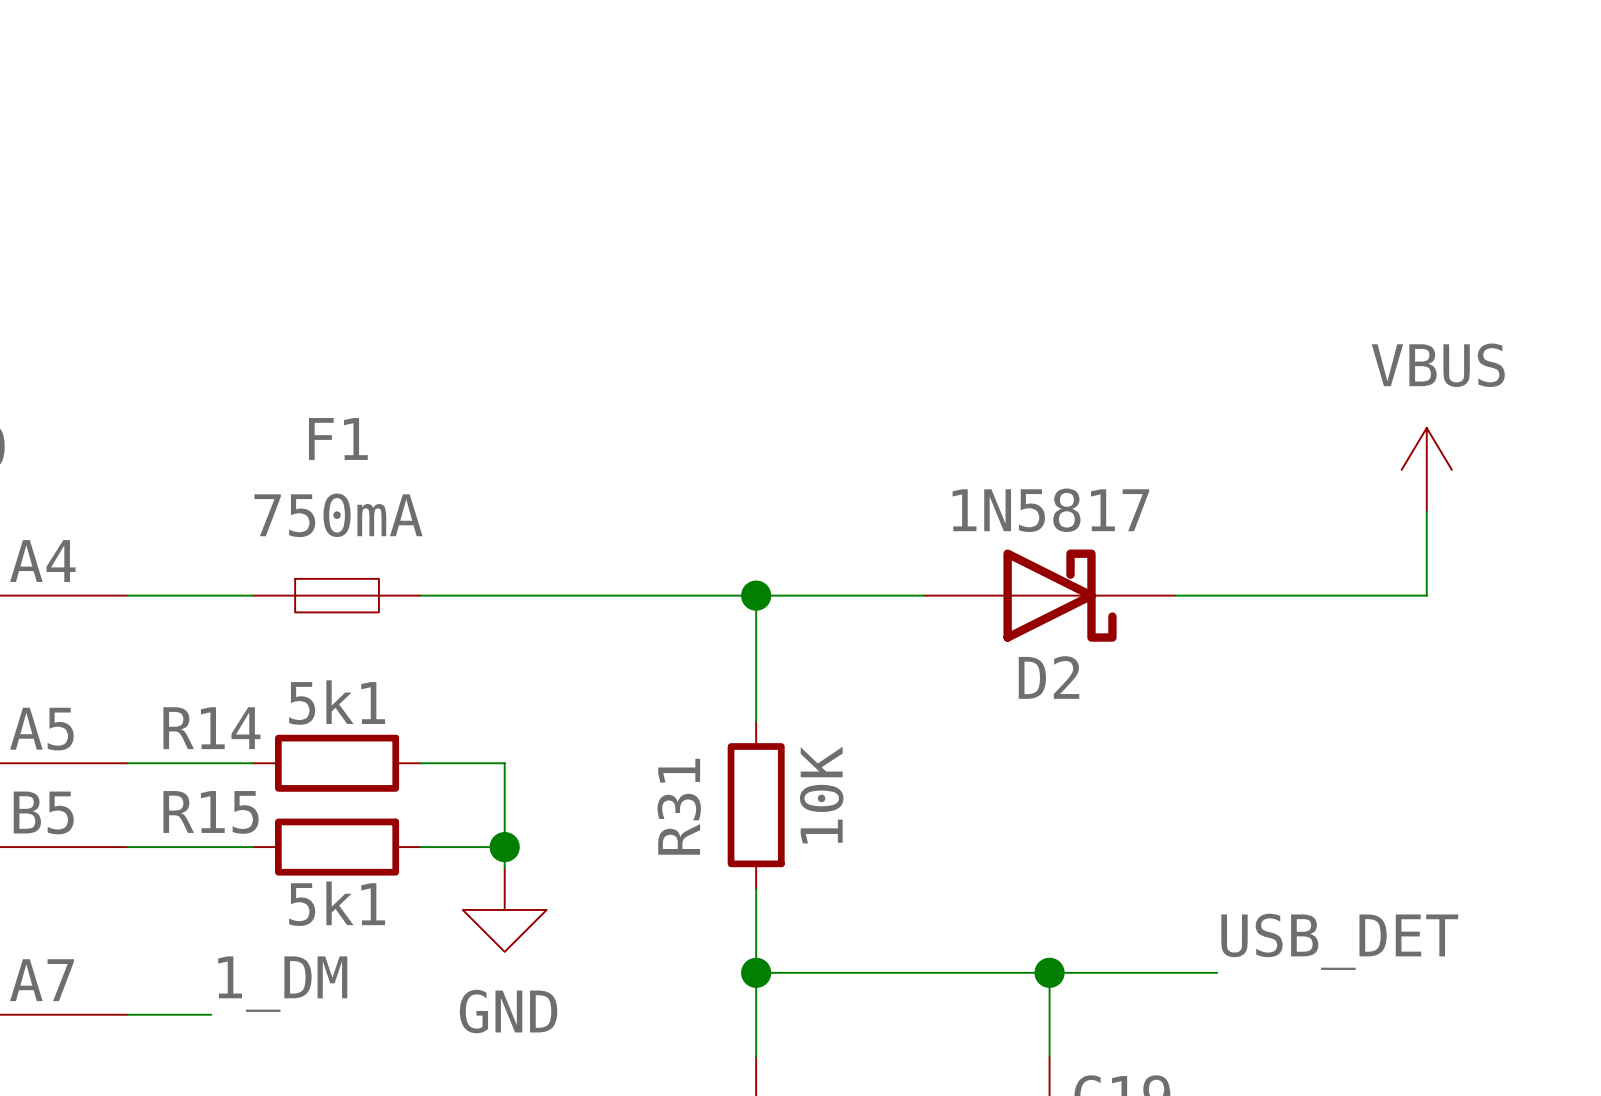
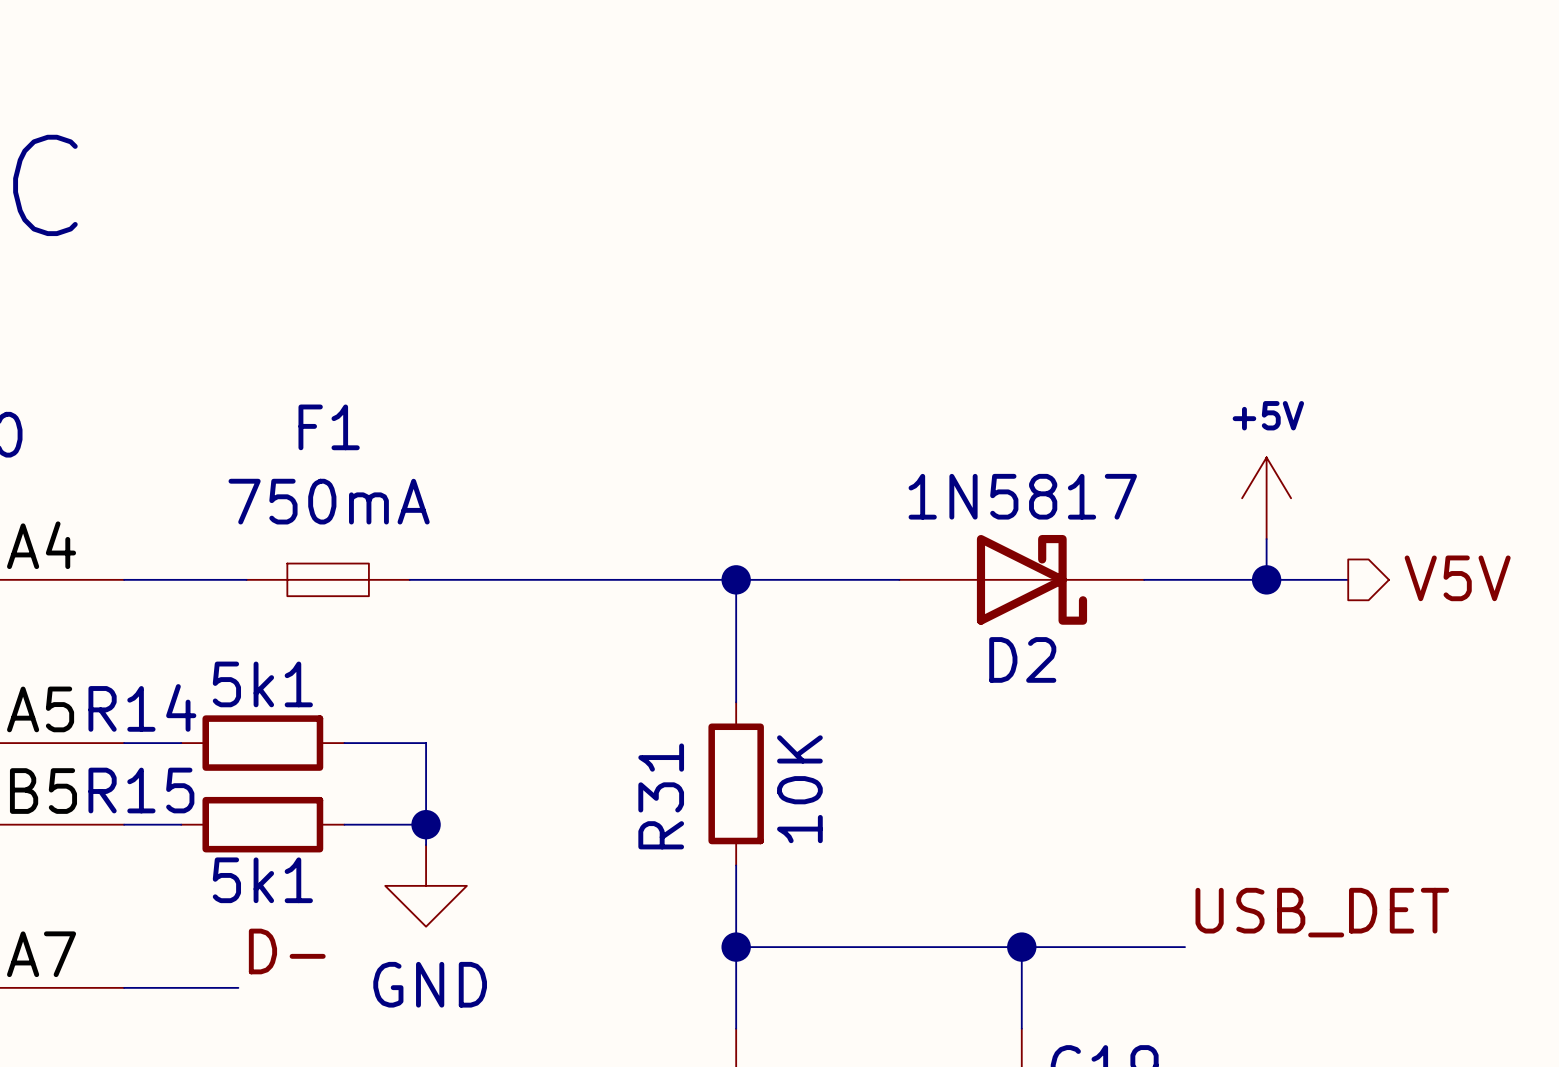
power symbol: VBUS (1426, 469) -> none
power symbol: none -> +5V (1266, 498)
wire: (1426, 511) (1426, 595) (1384, 595) -> none
wire: none -> (1266, 539) (1266, 579)
hierarchical label: none -> V5V (1457, 578)
junction: none -> (1266, 579)
wire: (186, 763) (253, 763) -> (344, 743) (409, 743)
R14 position: (337, 763) -> (262, 743)
wire: (437, 763) (504, 763) (504, 868) -> (426, 743) (426, 845)
wire: (186, 847) (253, 847) -> (344, 824) (409, 824)
R15 position: (337, 847) -> (262, 824)
wire: (437, 847) (504, 847) -> none
junction position: (504, 847) -> (426, 824)
power symbol position: GND (504, 909) -> GND (426, 885)
label: none -> D- (287, 951)
label: 1_DM (282, 984) -> none
wire: none -> (205, 987) (238, 987)

